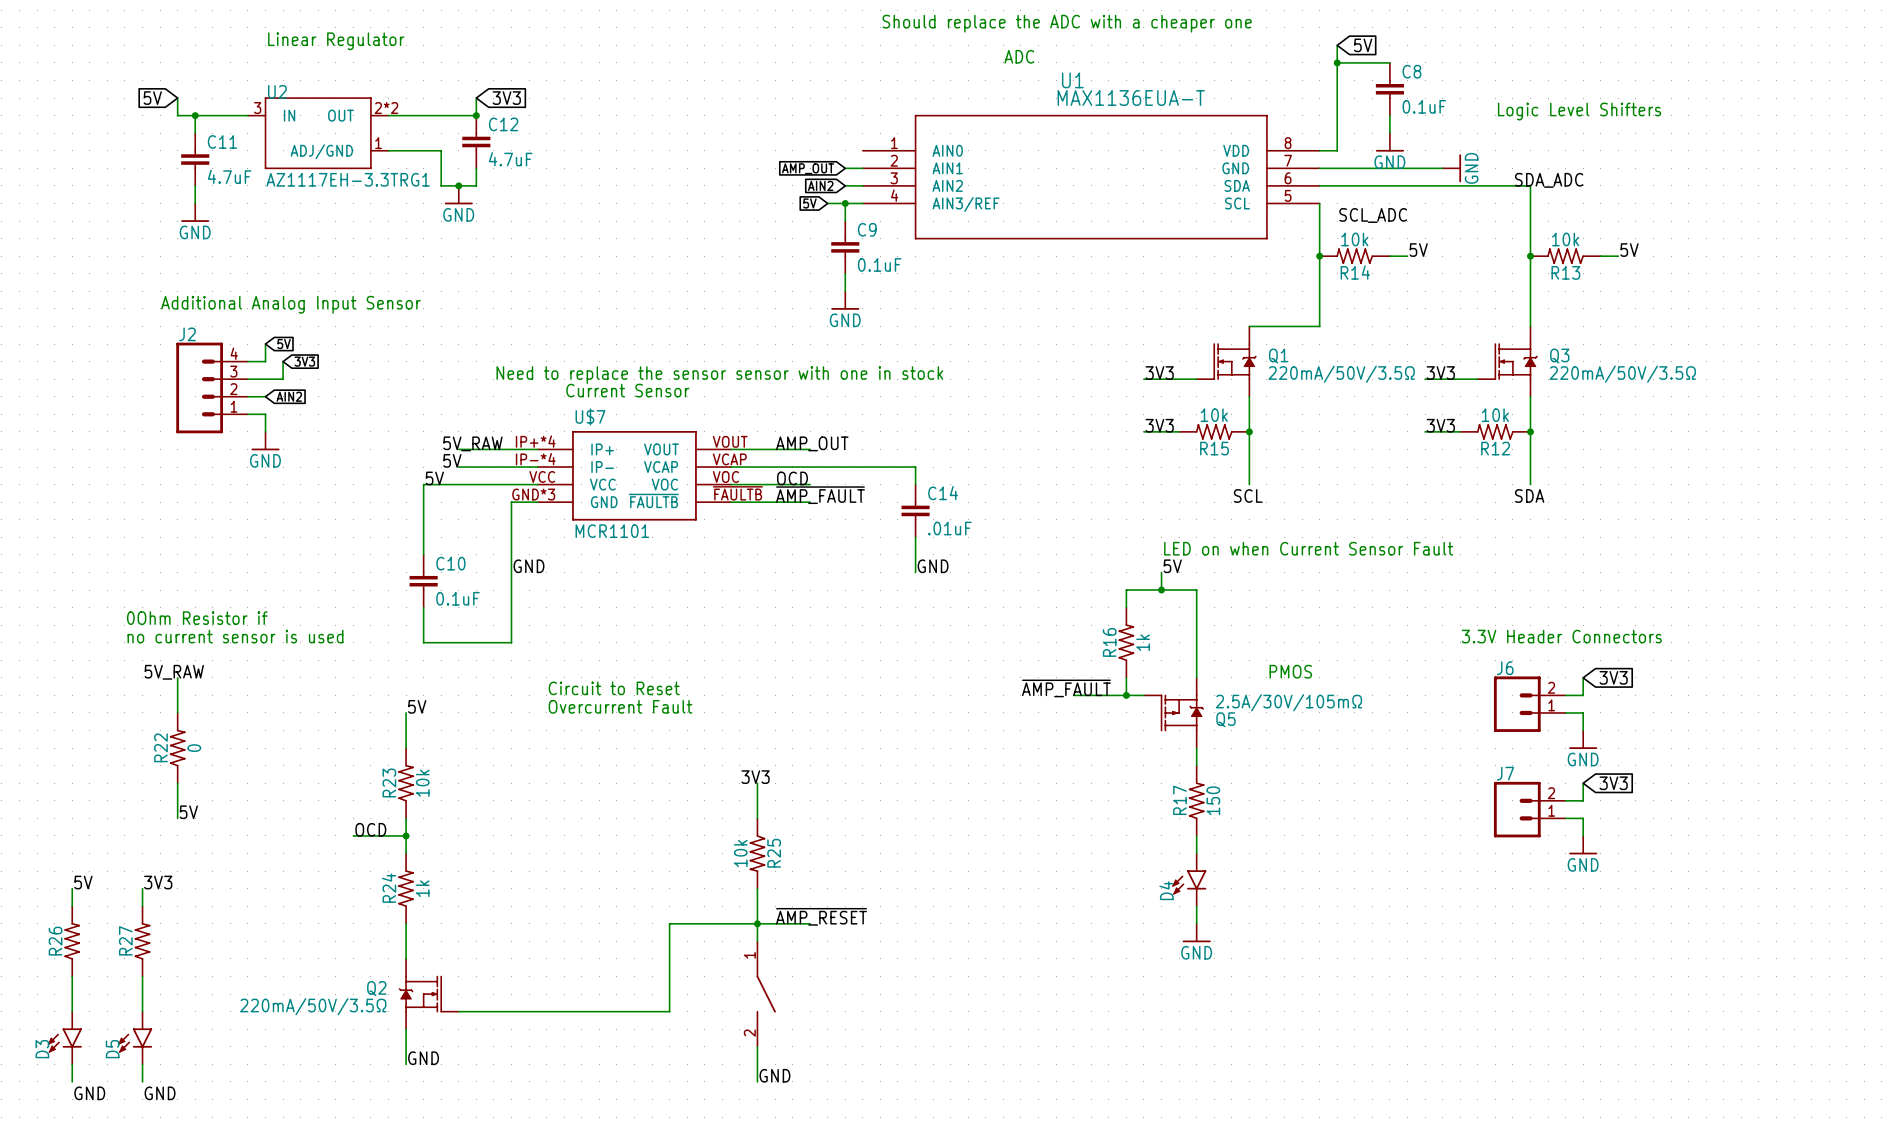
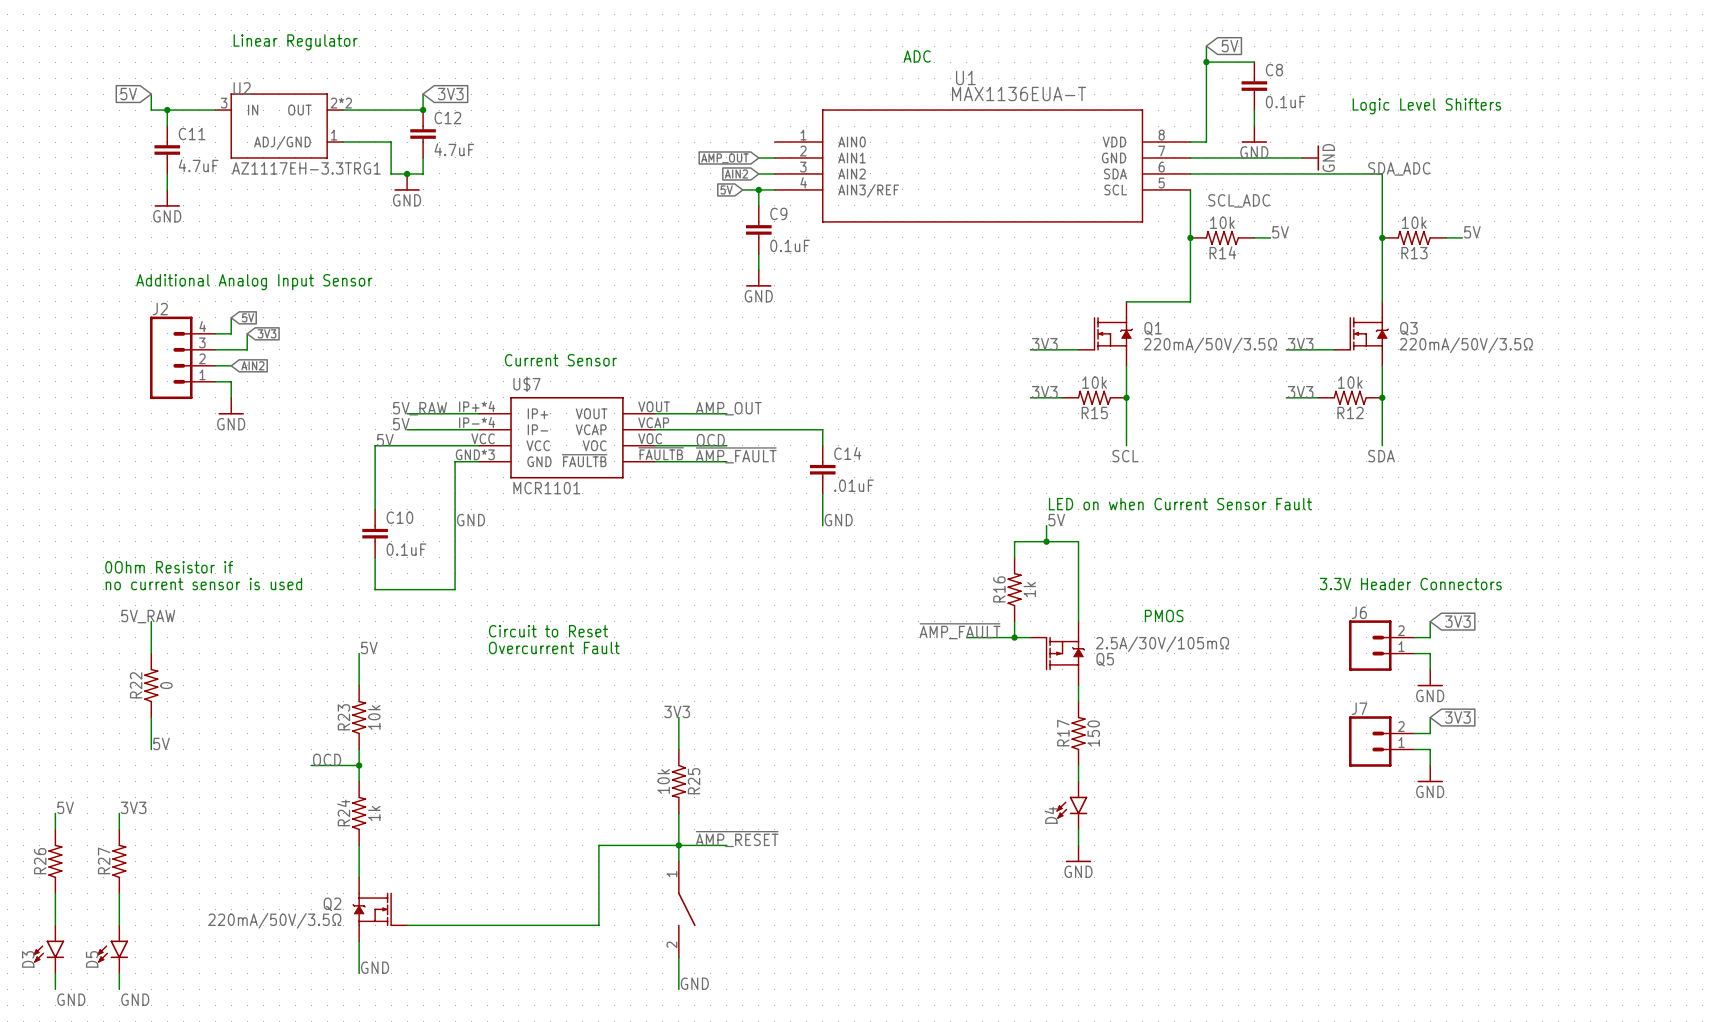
text: Should replace the ADC with a cheaper one (1067, 23) -> none
text: Need to replace the sensor sensor with one in stock (719, 375) -> none

